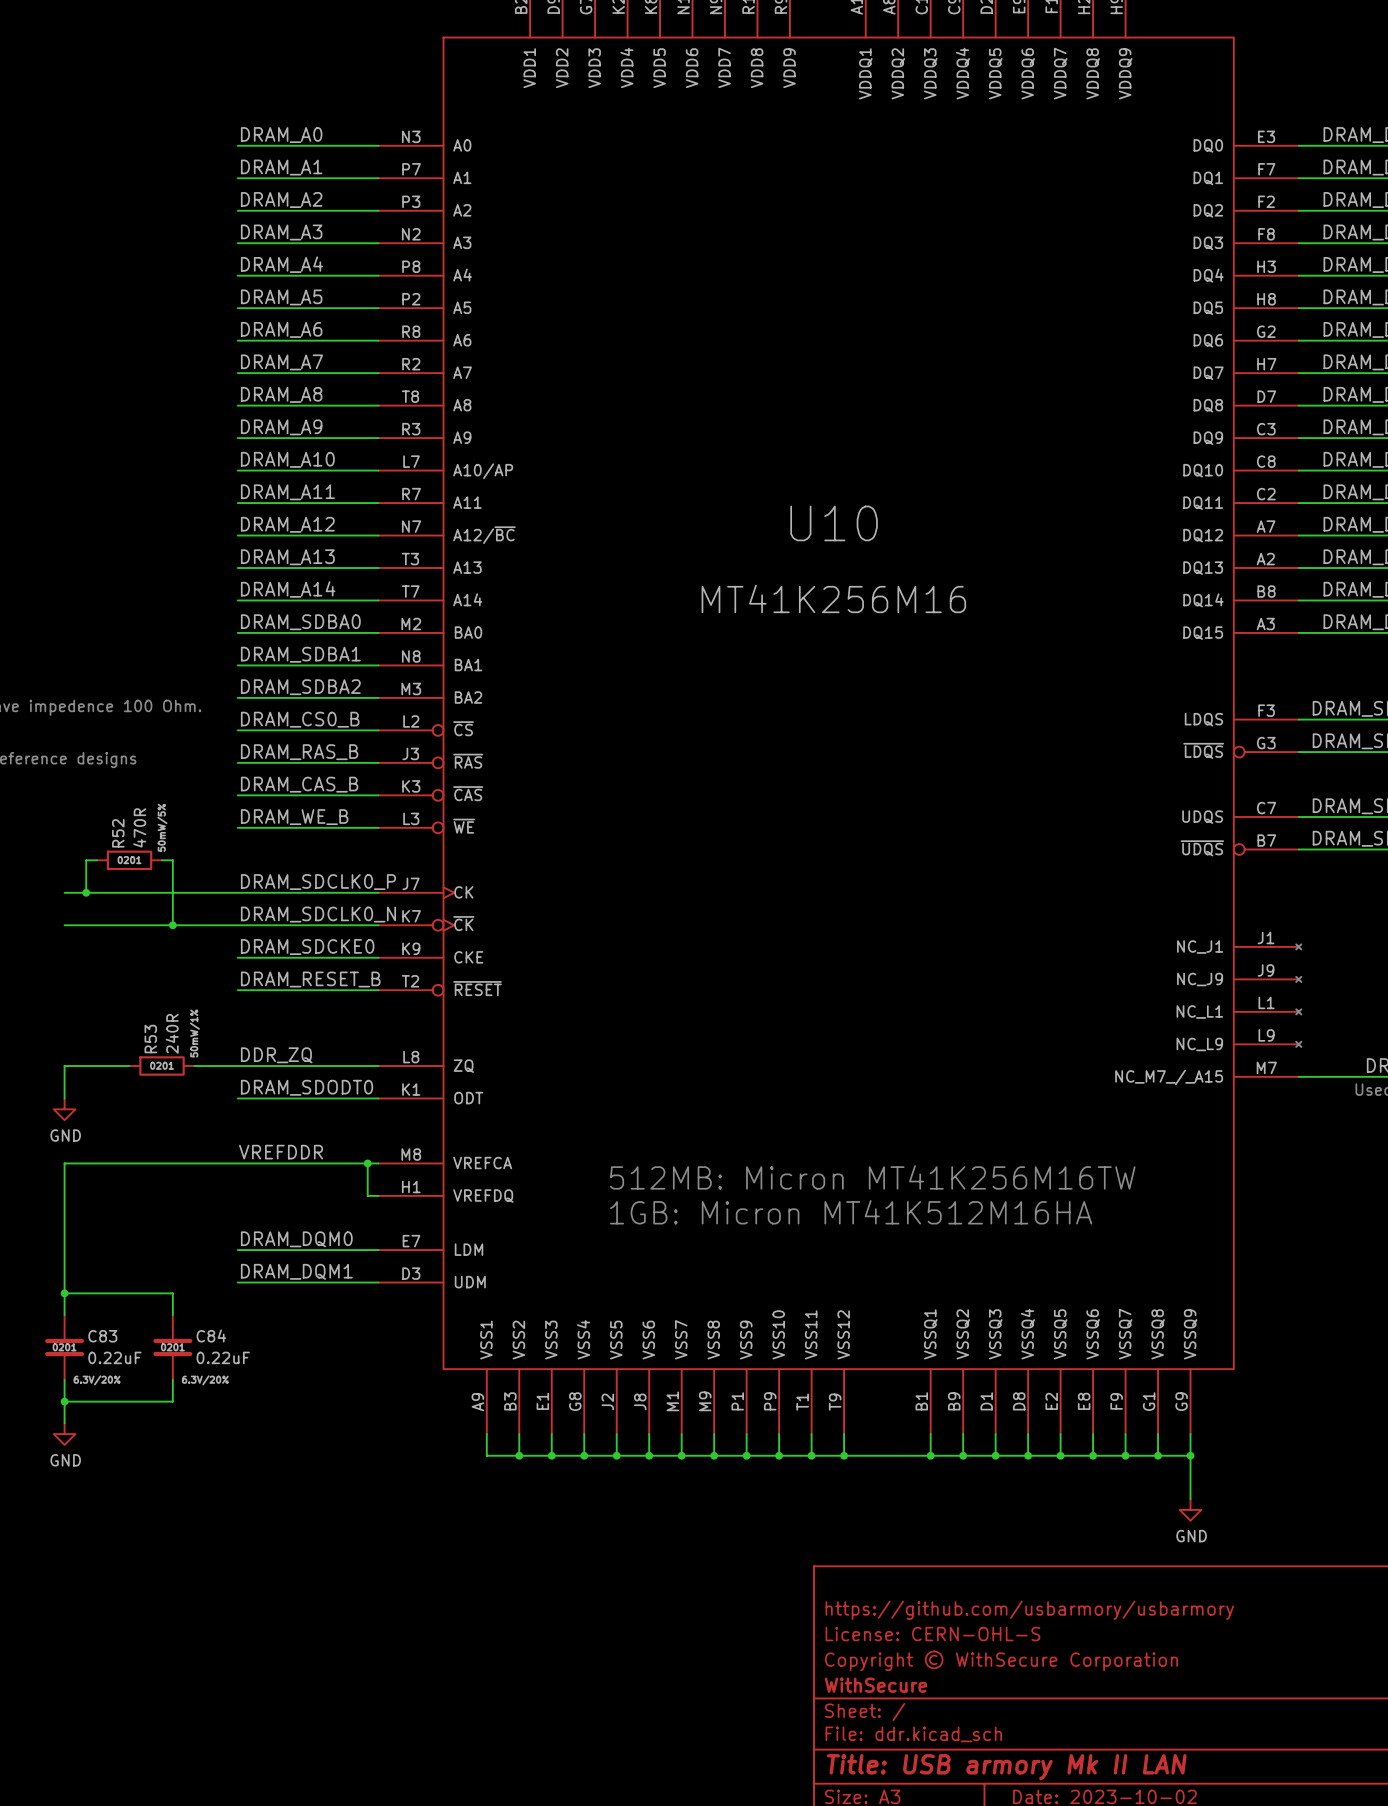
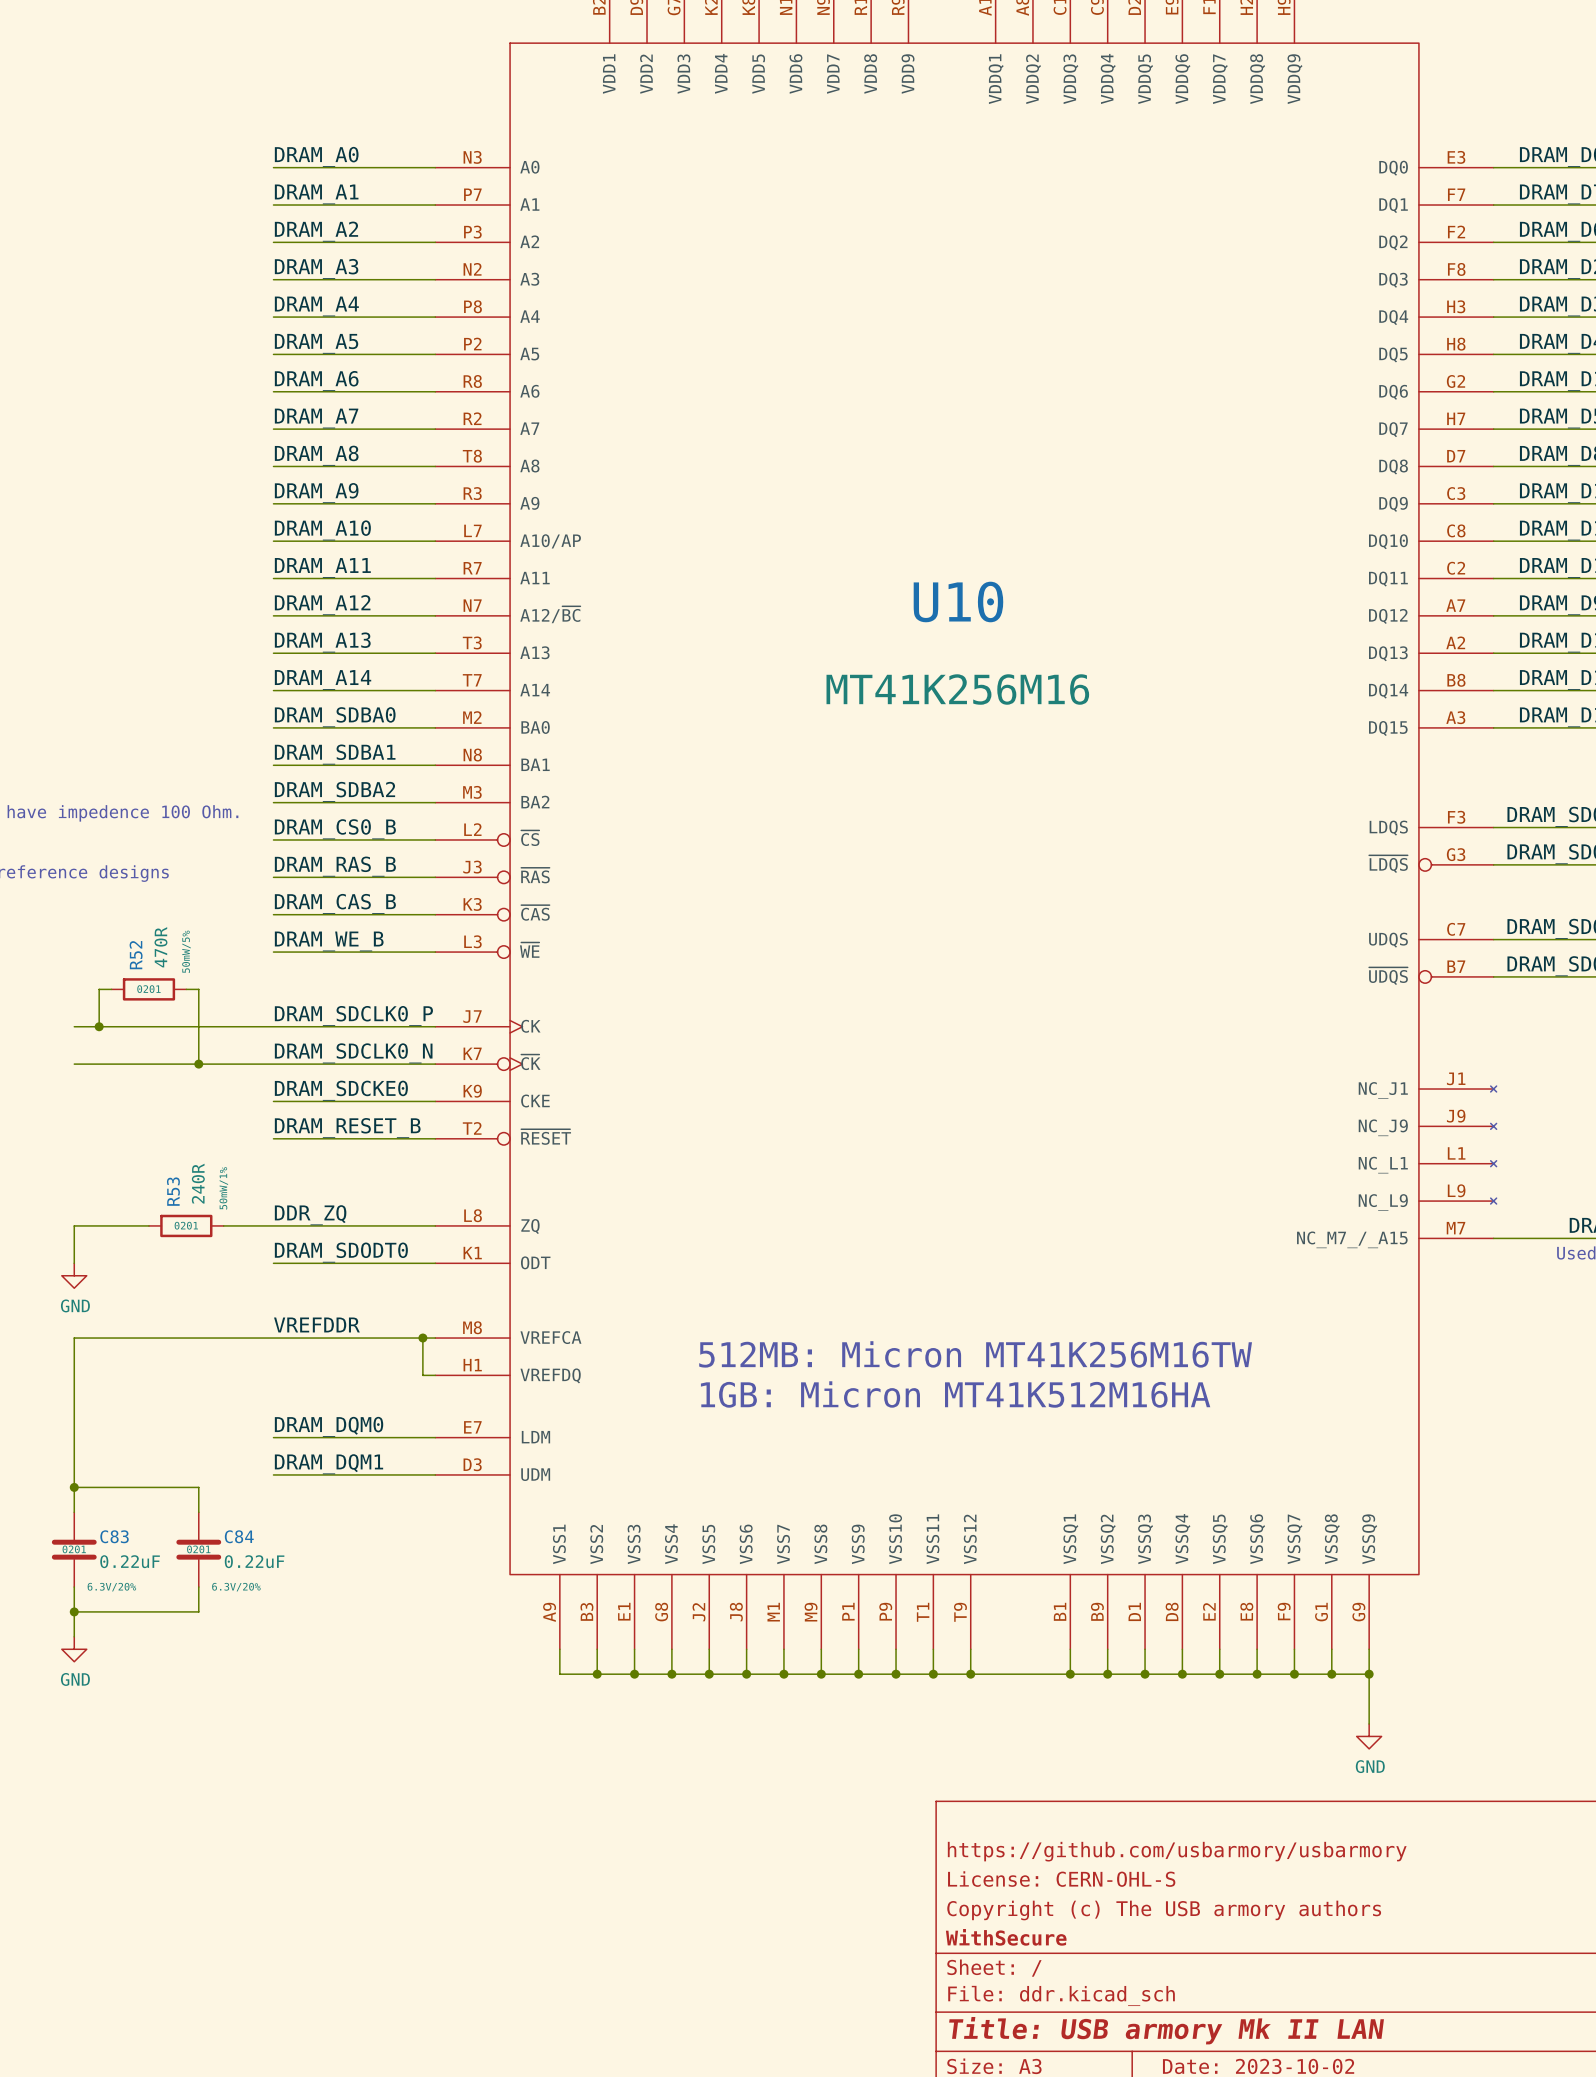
title block: Copyright © WithSecure Corporation (1001, 1660) -> Copyright (c) The USB armory authors (1164, 1910)

